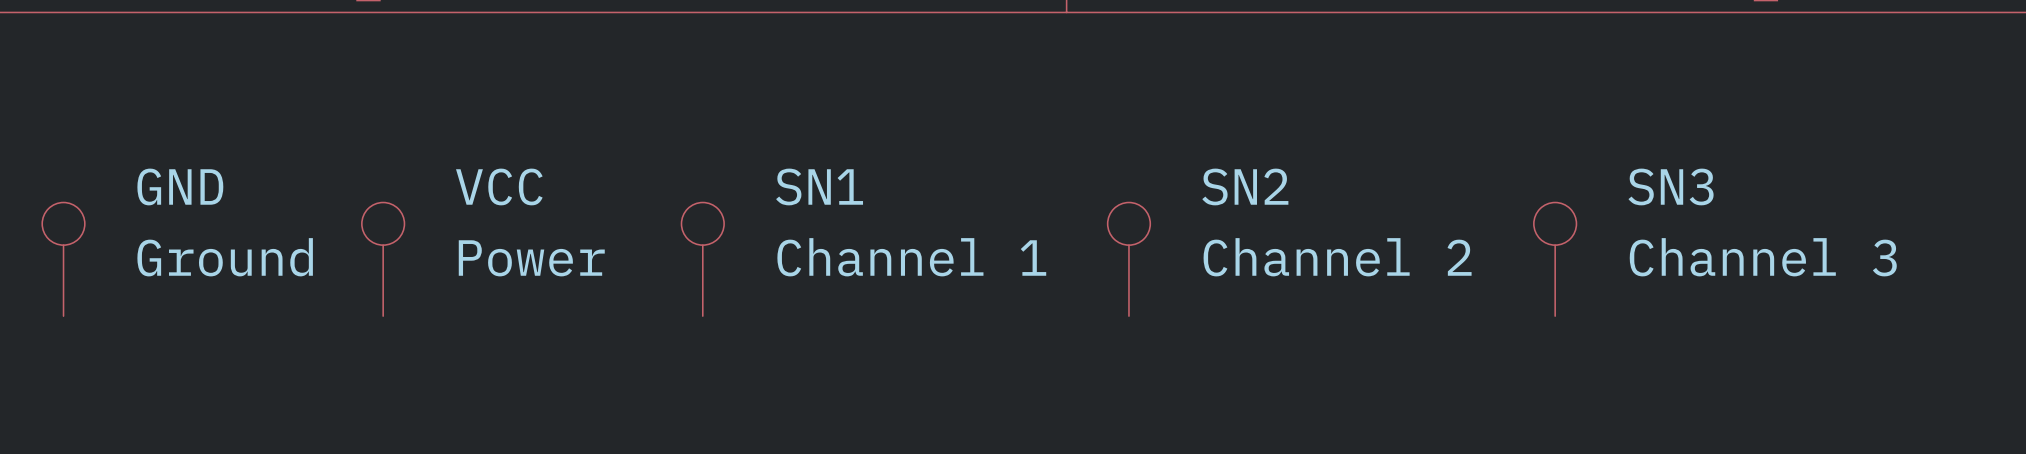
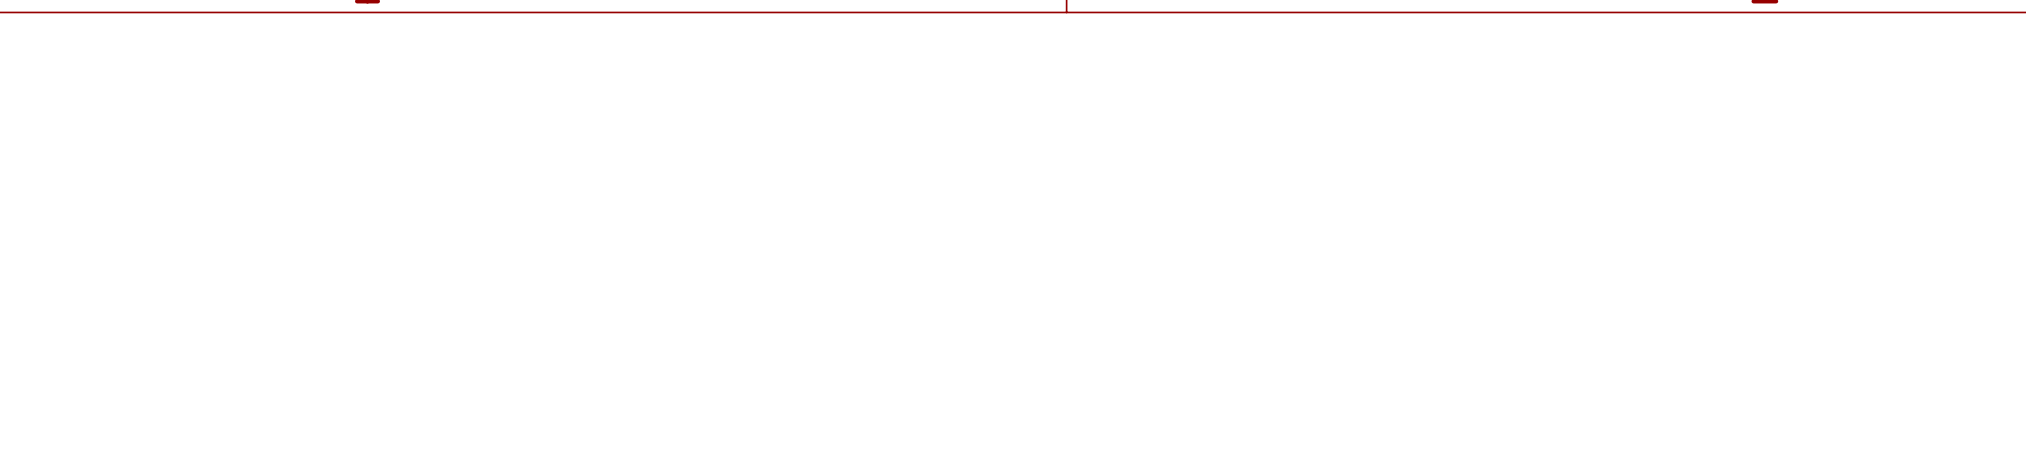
GND: Ground (63, 259) -> none
VCC: Power (383, 259) -> none
SN1: Channel 1 (702, 259) -> none
SN2: Channel 2 (1128, 259) -> none
SN3: Channel 3 (1555, 259) -> none

